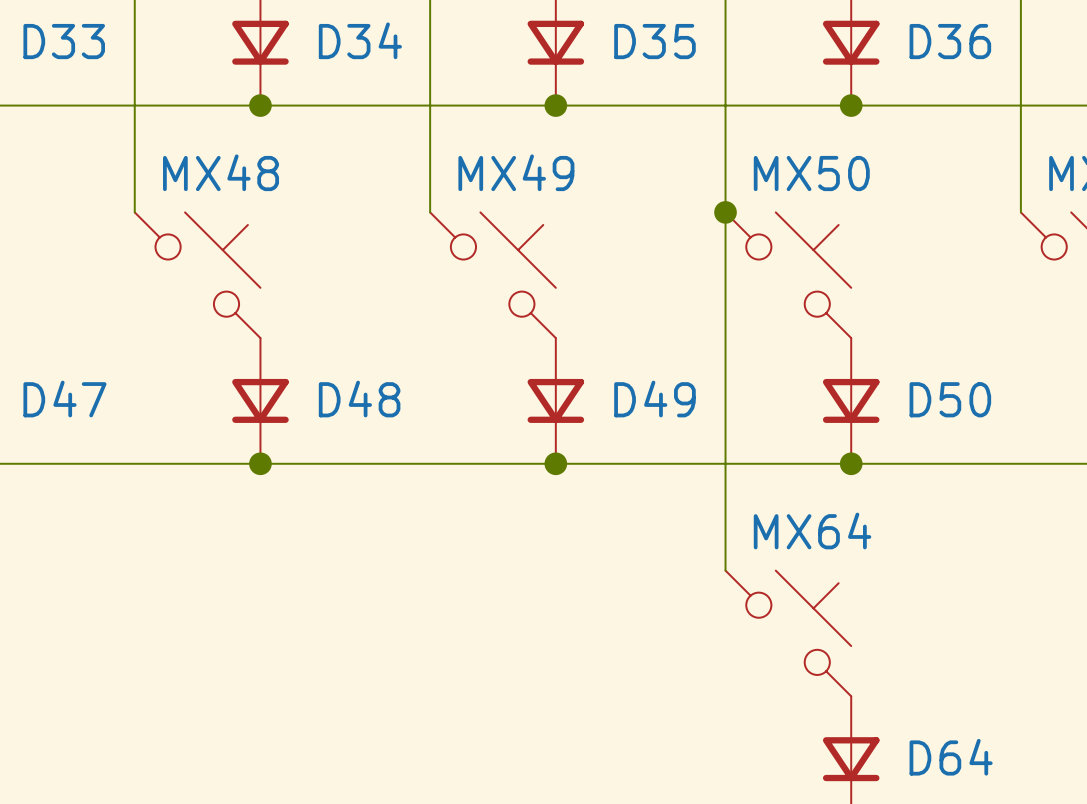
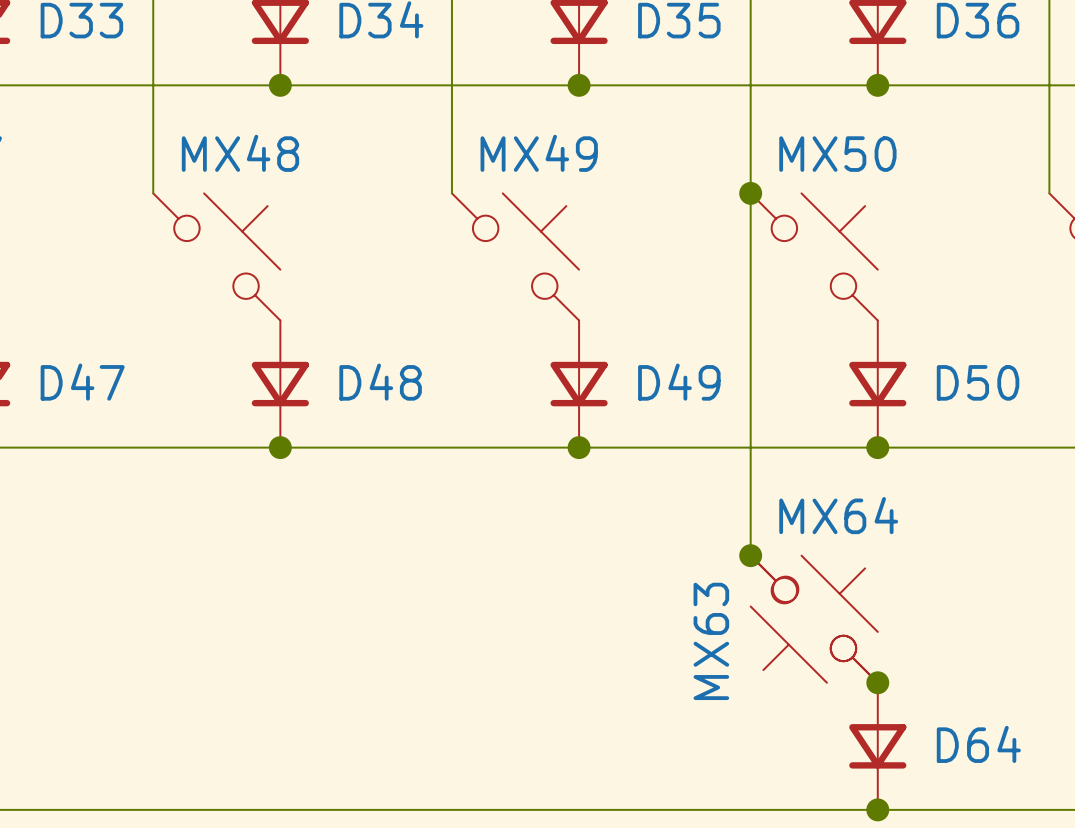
junction: none -> (750, 555)
MX63: none -> (814, 619)
junction: none -> (877, 682)

